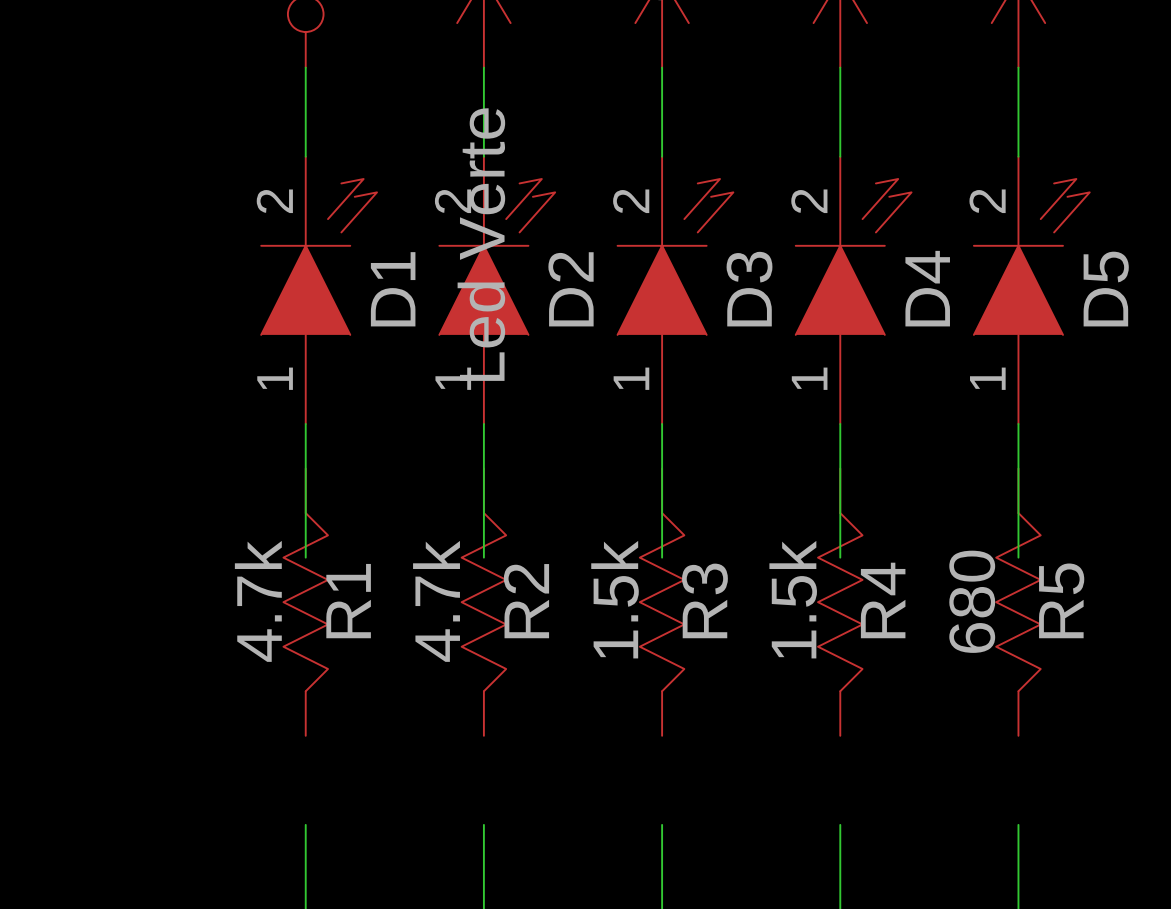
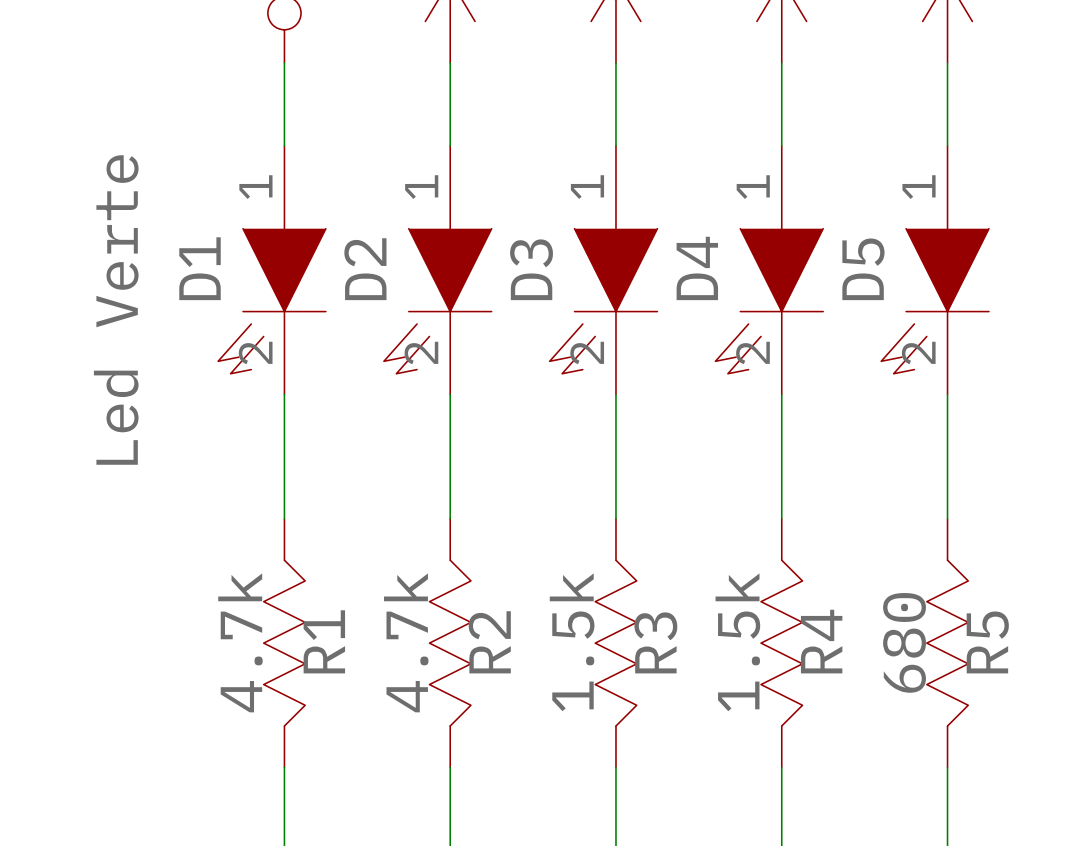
D1 rotation: 0° (319, 256) -> 180° (272, 301)
D2 rotation: 0° (497, 256) -> 180° (437, 301)
D3 rotation: 0° (675, 256) -> 180° (603, 301)
D4 rotation: 0° (853, 256) -> 180° (769, 301)
D5 rotation: 0° (1031, 256) -> 180° (935, 301)
R1 position: (305, 602) -> (284, 643)
R2 position: (483, 602) -> (450, 643)
R3 position: (662, 602) -> (615, 643)
R4 position: (840, 602) -> (781, 643)
R5 position: (1018, 602) -> (947, 643)

